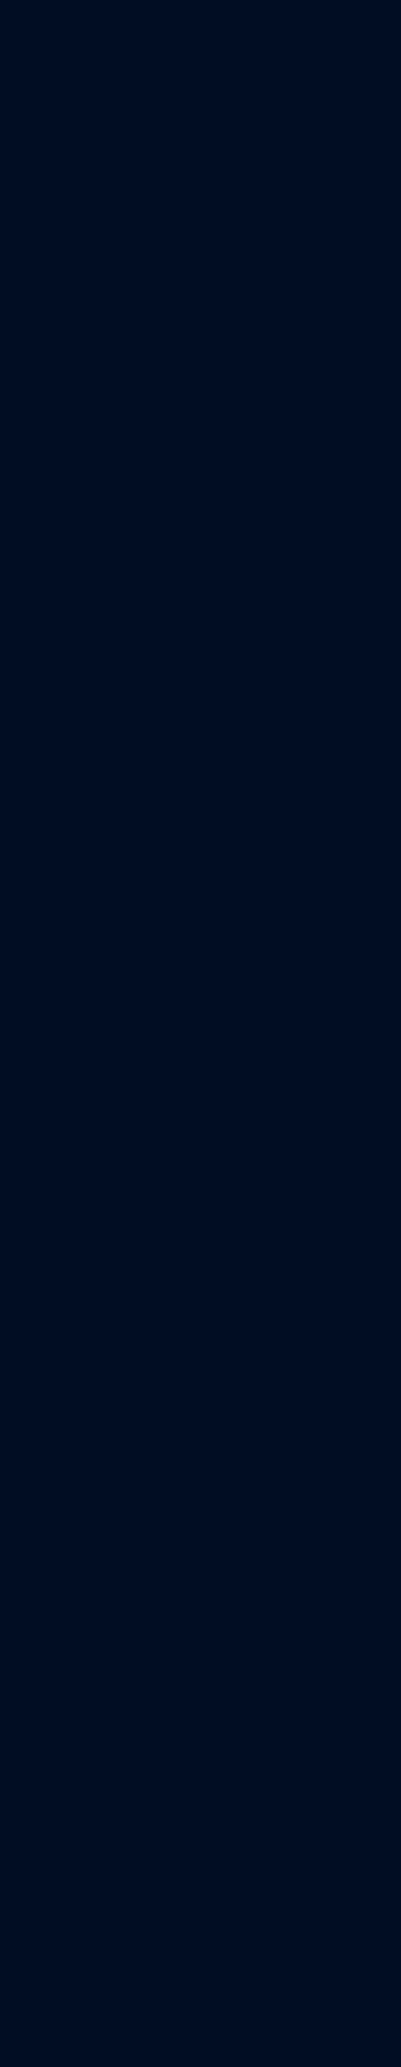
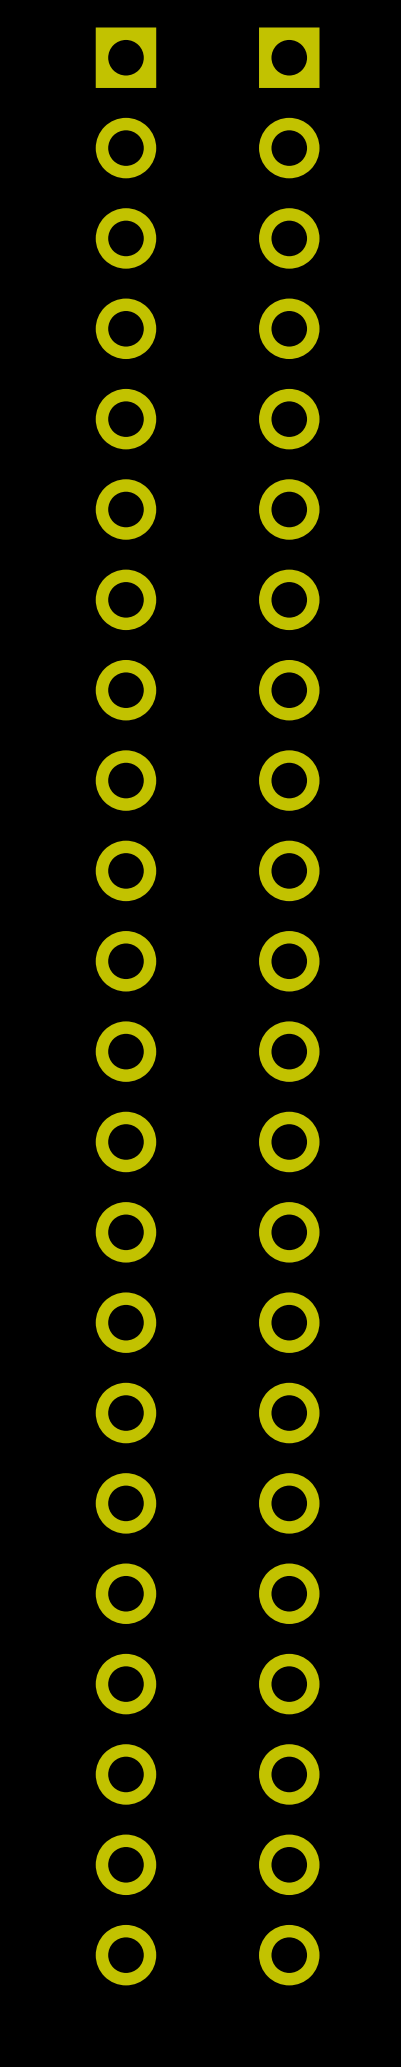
part: none -> (125, 1006)
part: none -> (289, 1006)

